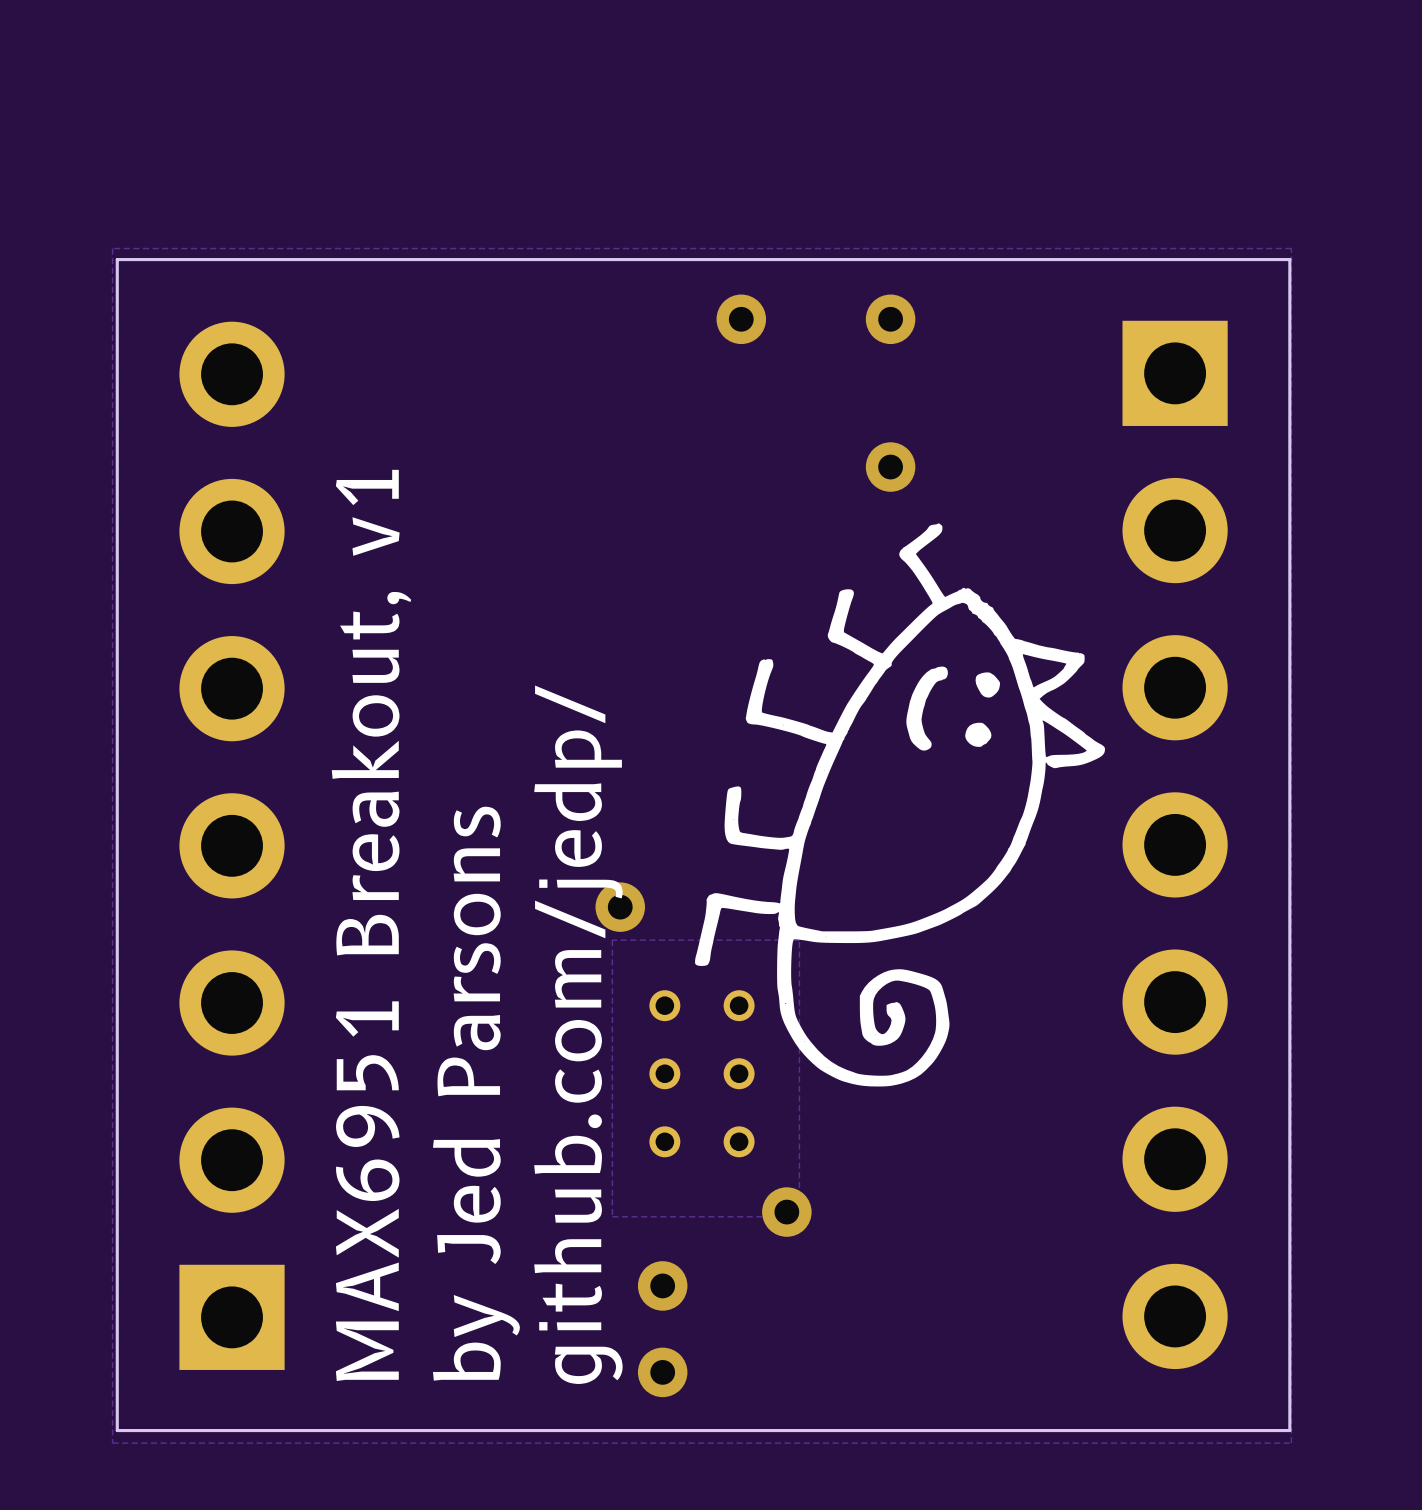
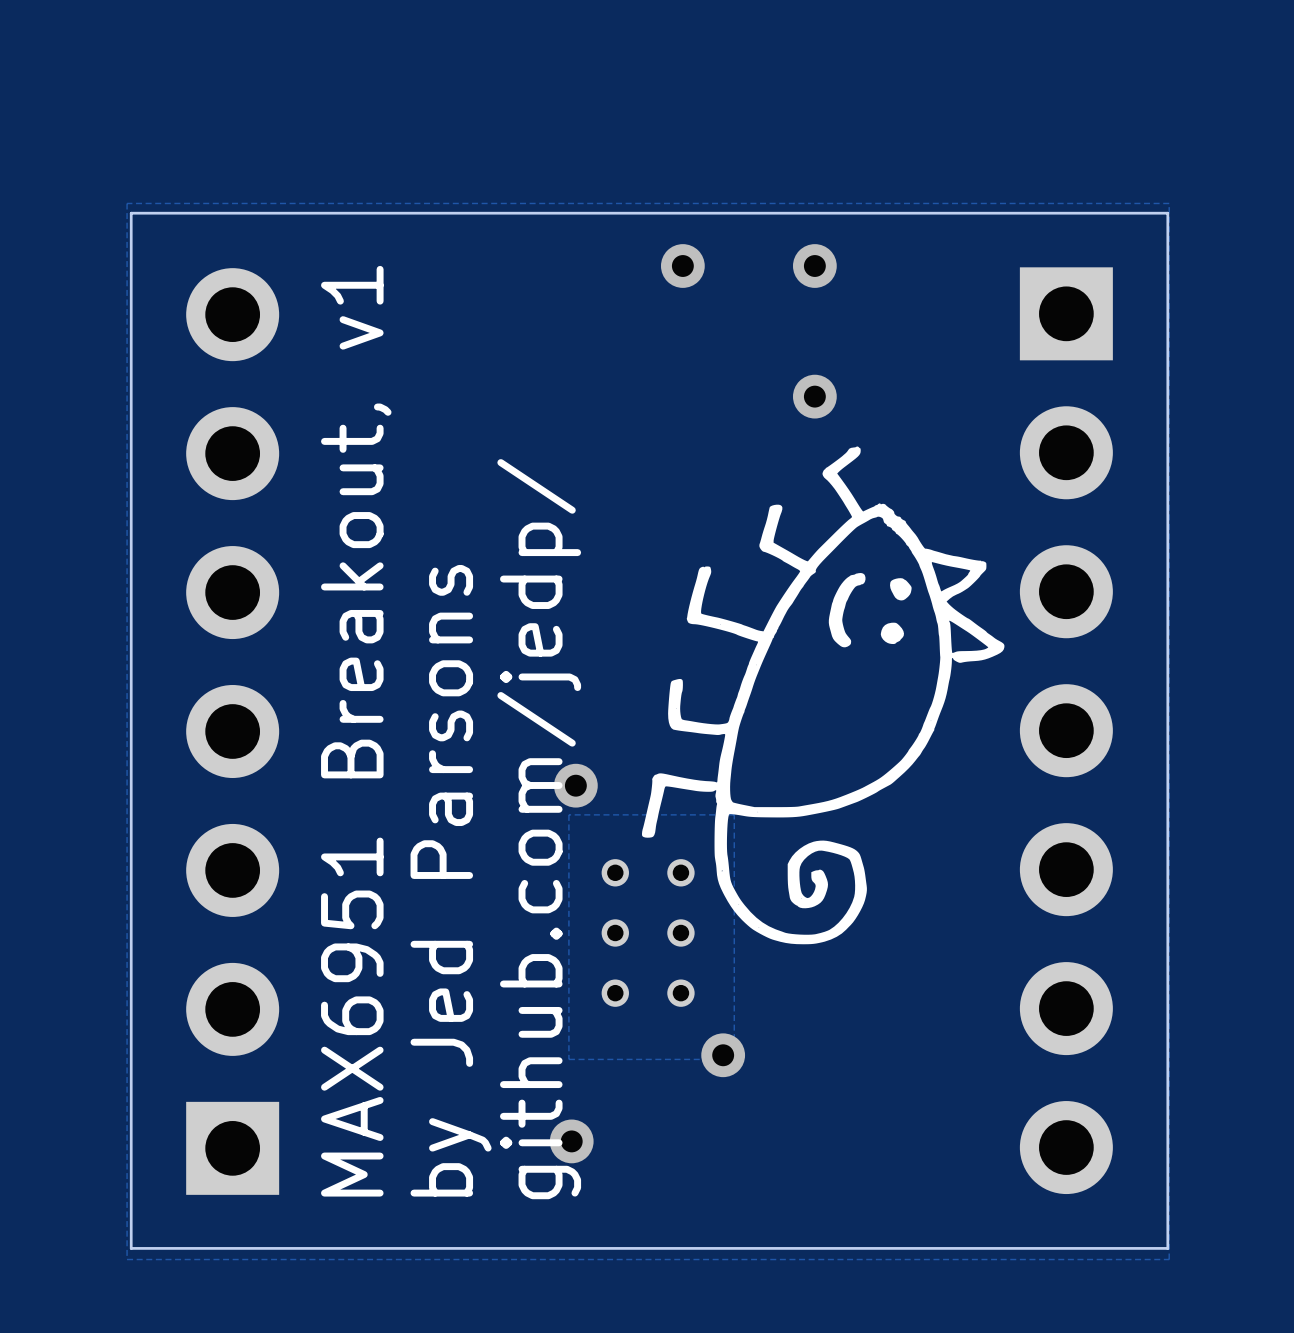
via position: (662, 1285) -> (571, 1141)
via: (662, 1372) -> none

